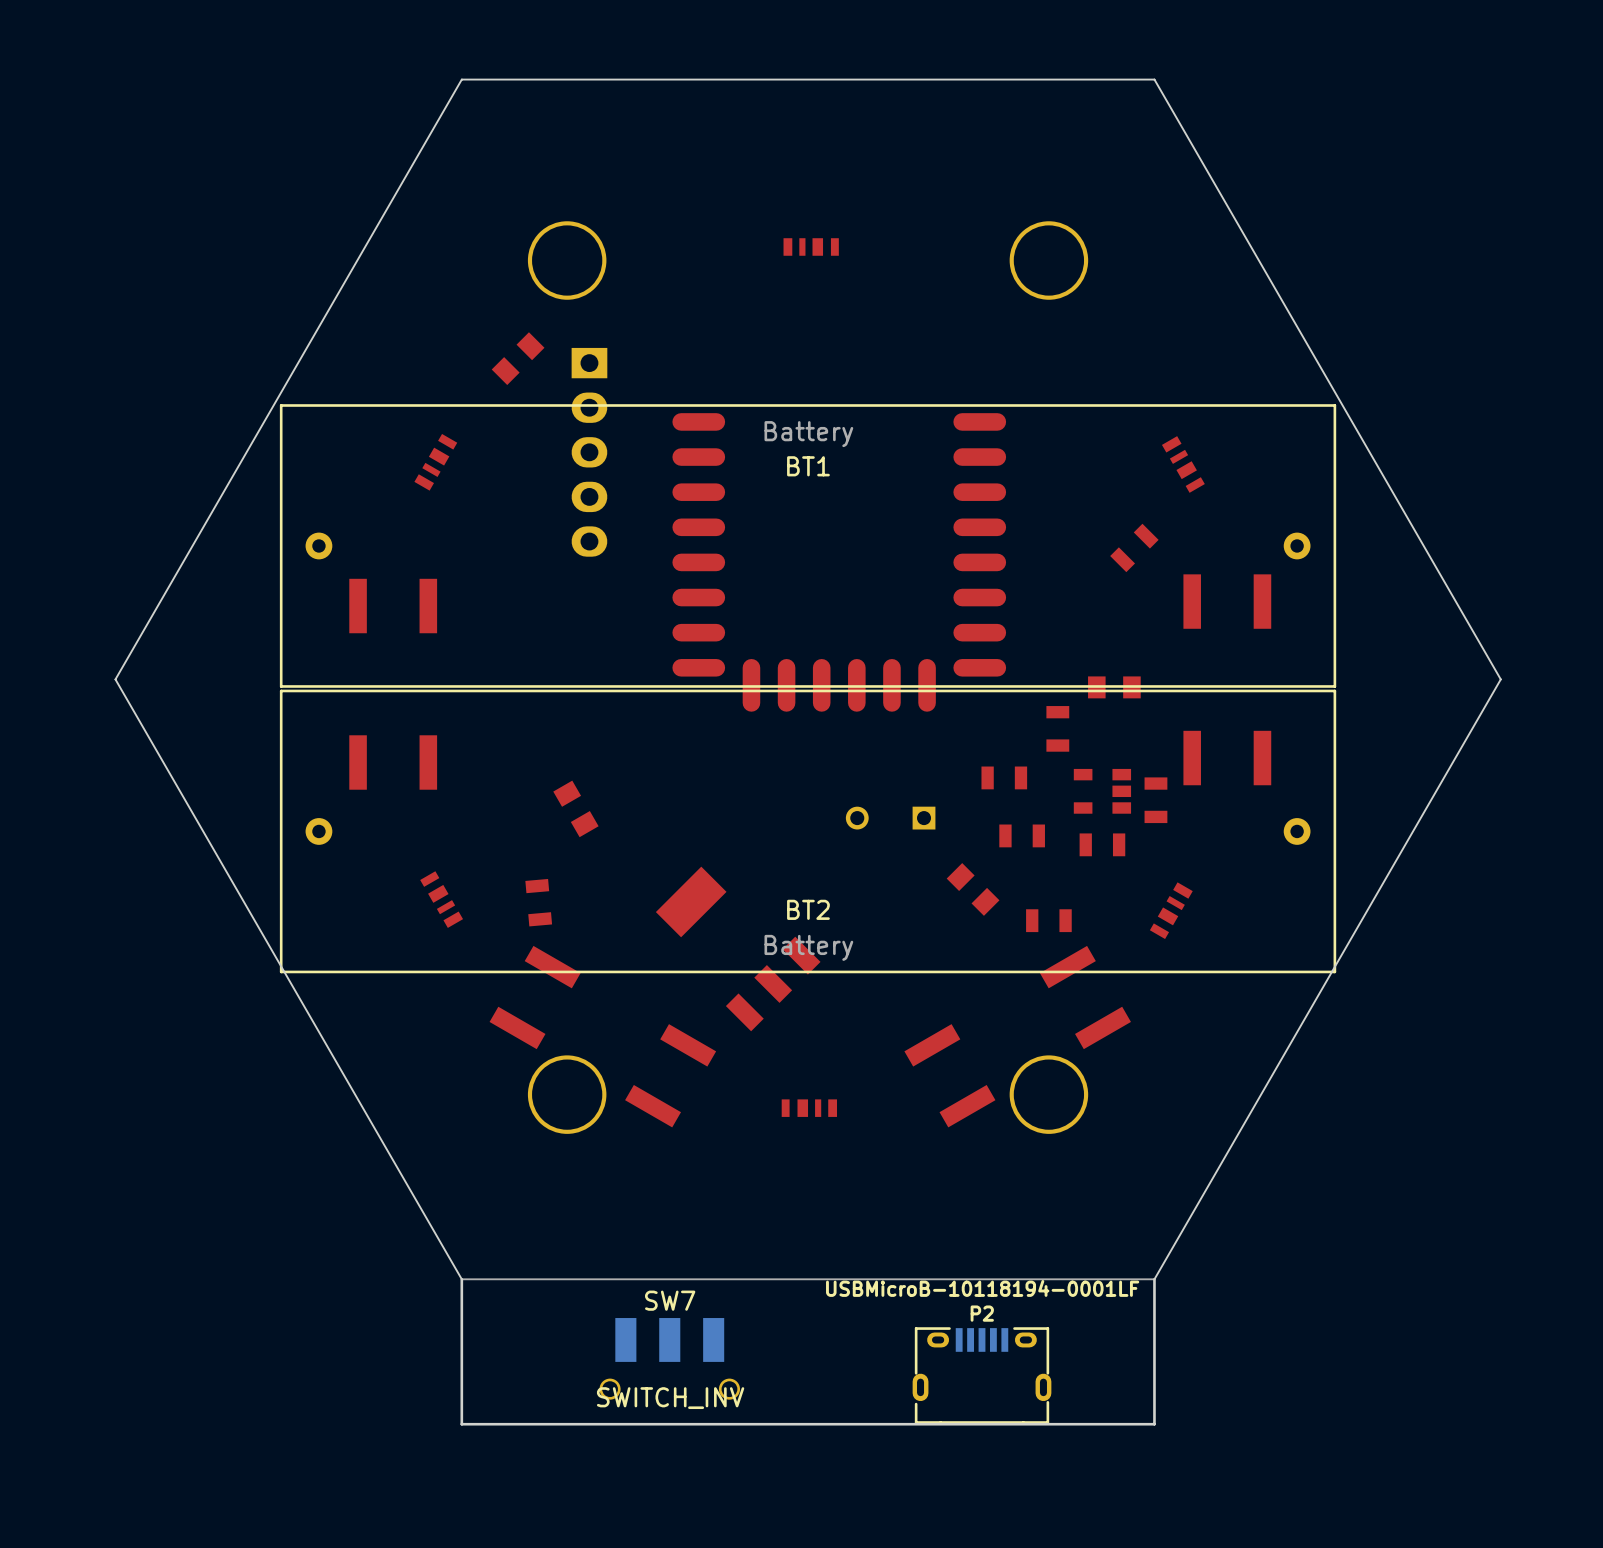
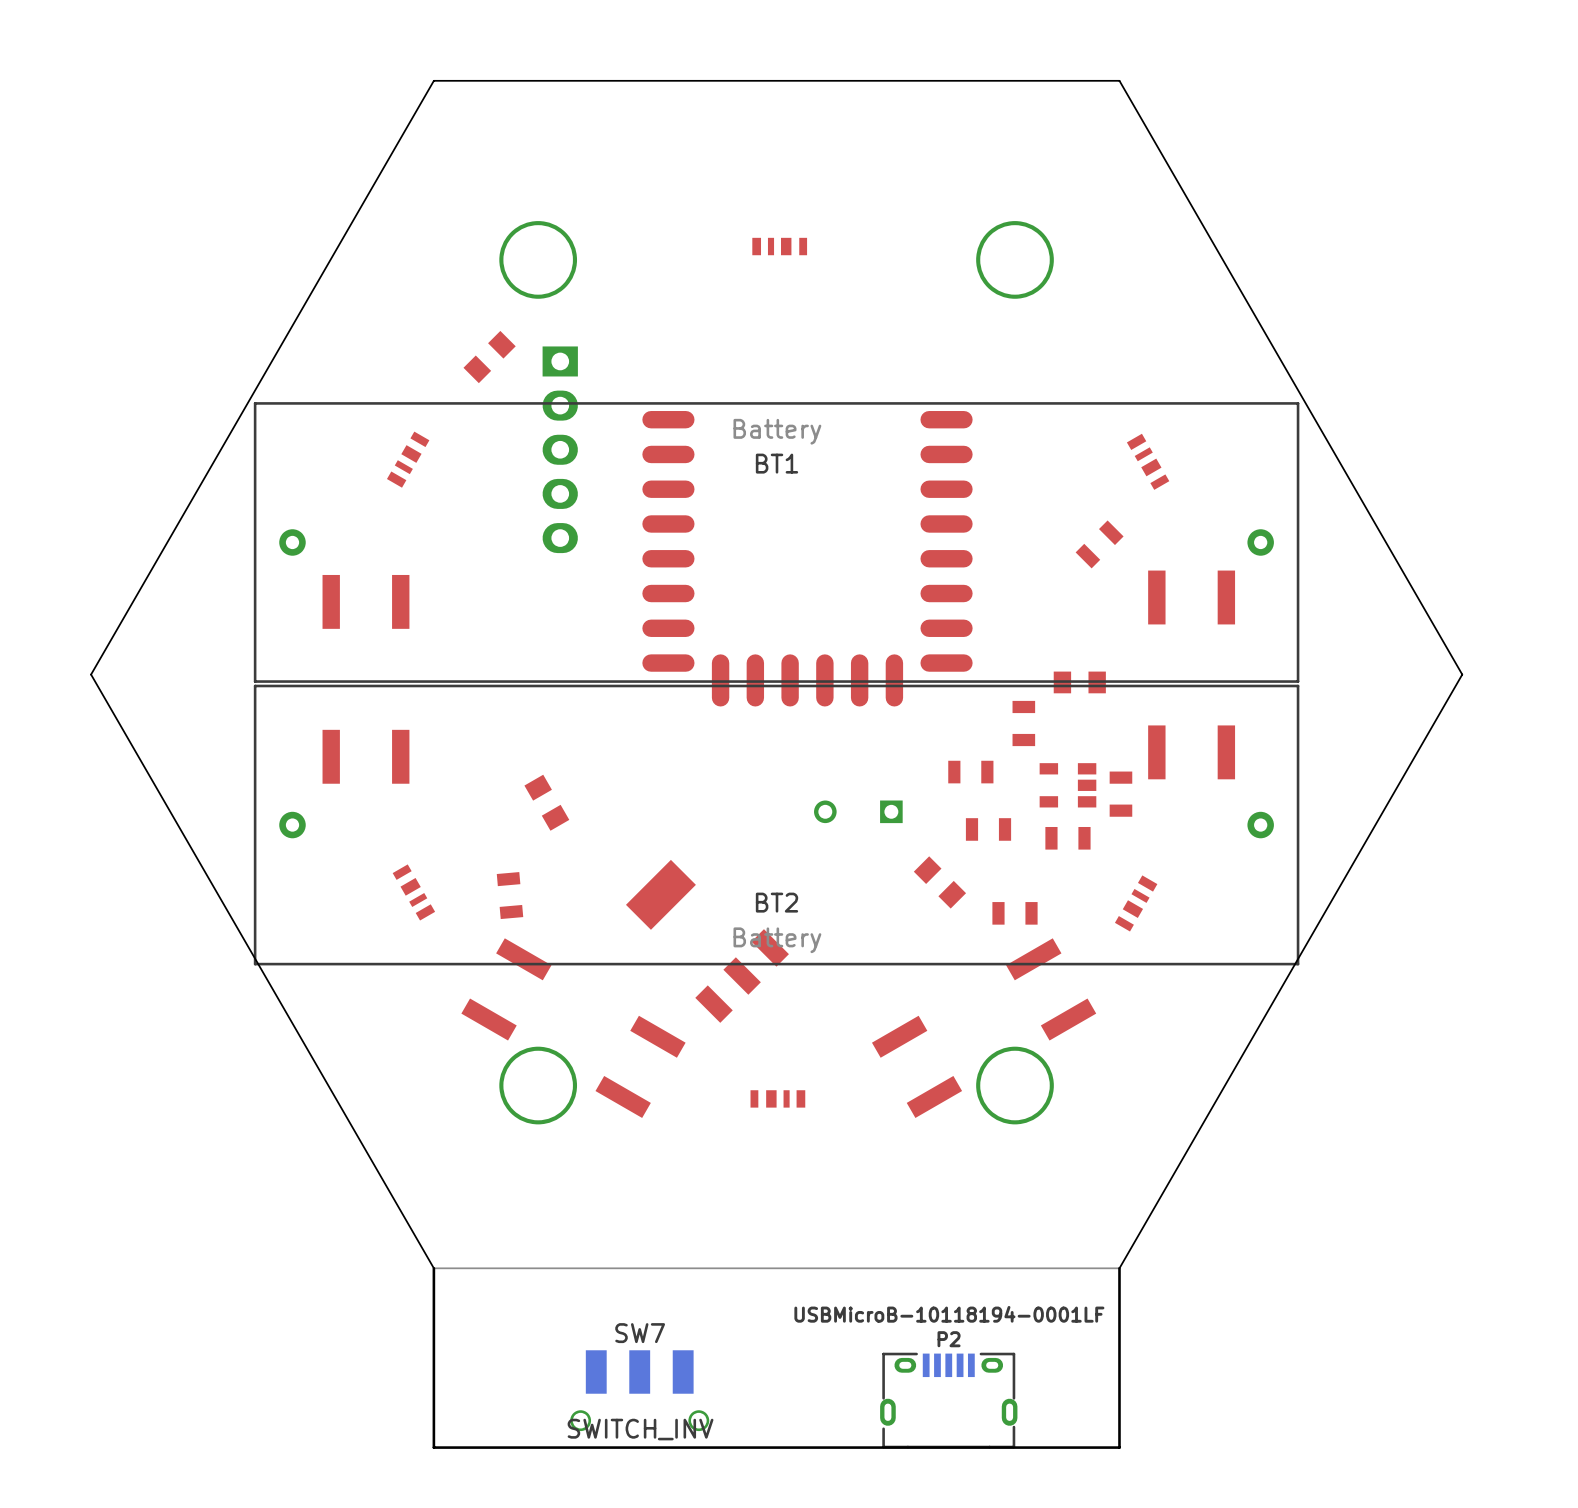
SW7 position: (669, 1358) -> (639, 1390)
P2 position: (982, 1375) -> (948, 1400)
board edge: (1154, 1424) (461, 1424) -> (1119, 1411) (1119, 1447) (433, 1447) (433, 1411)

